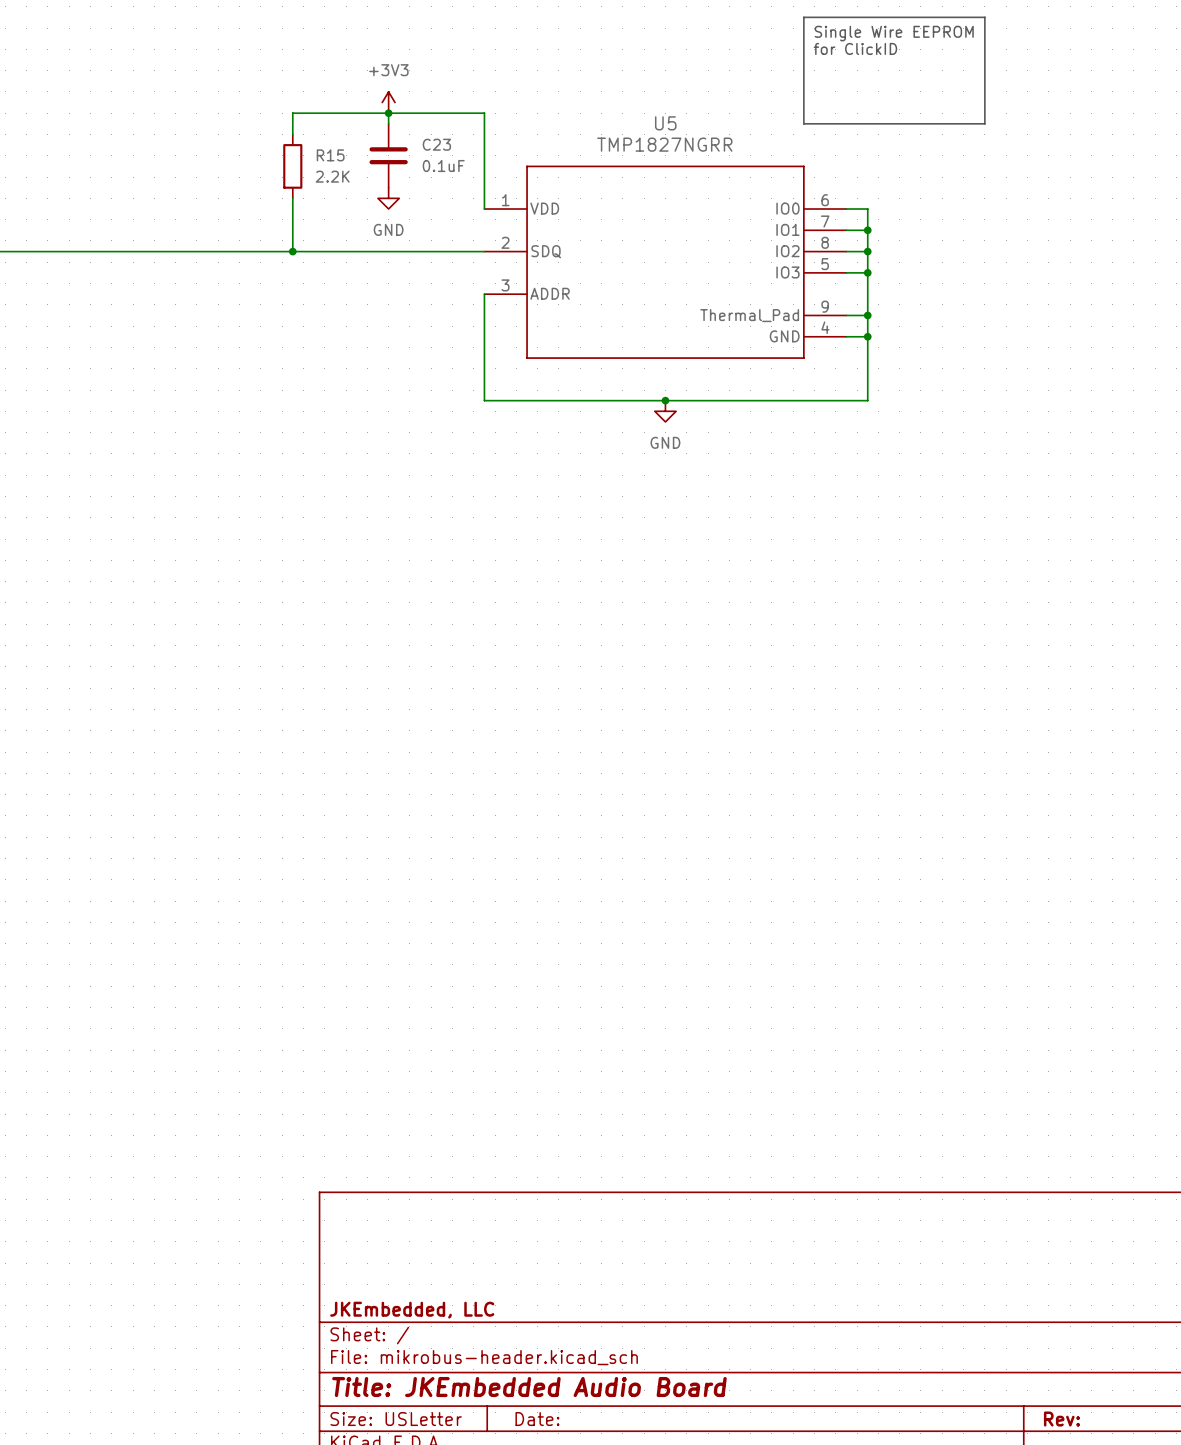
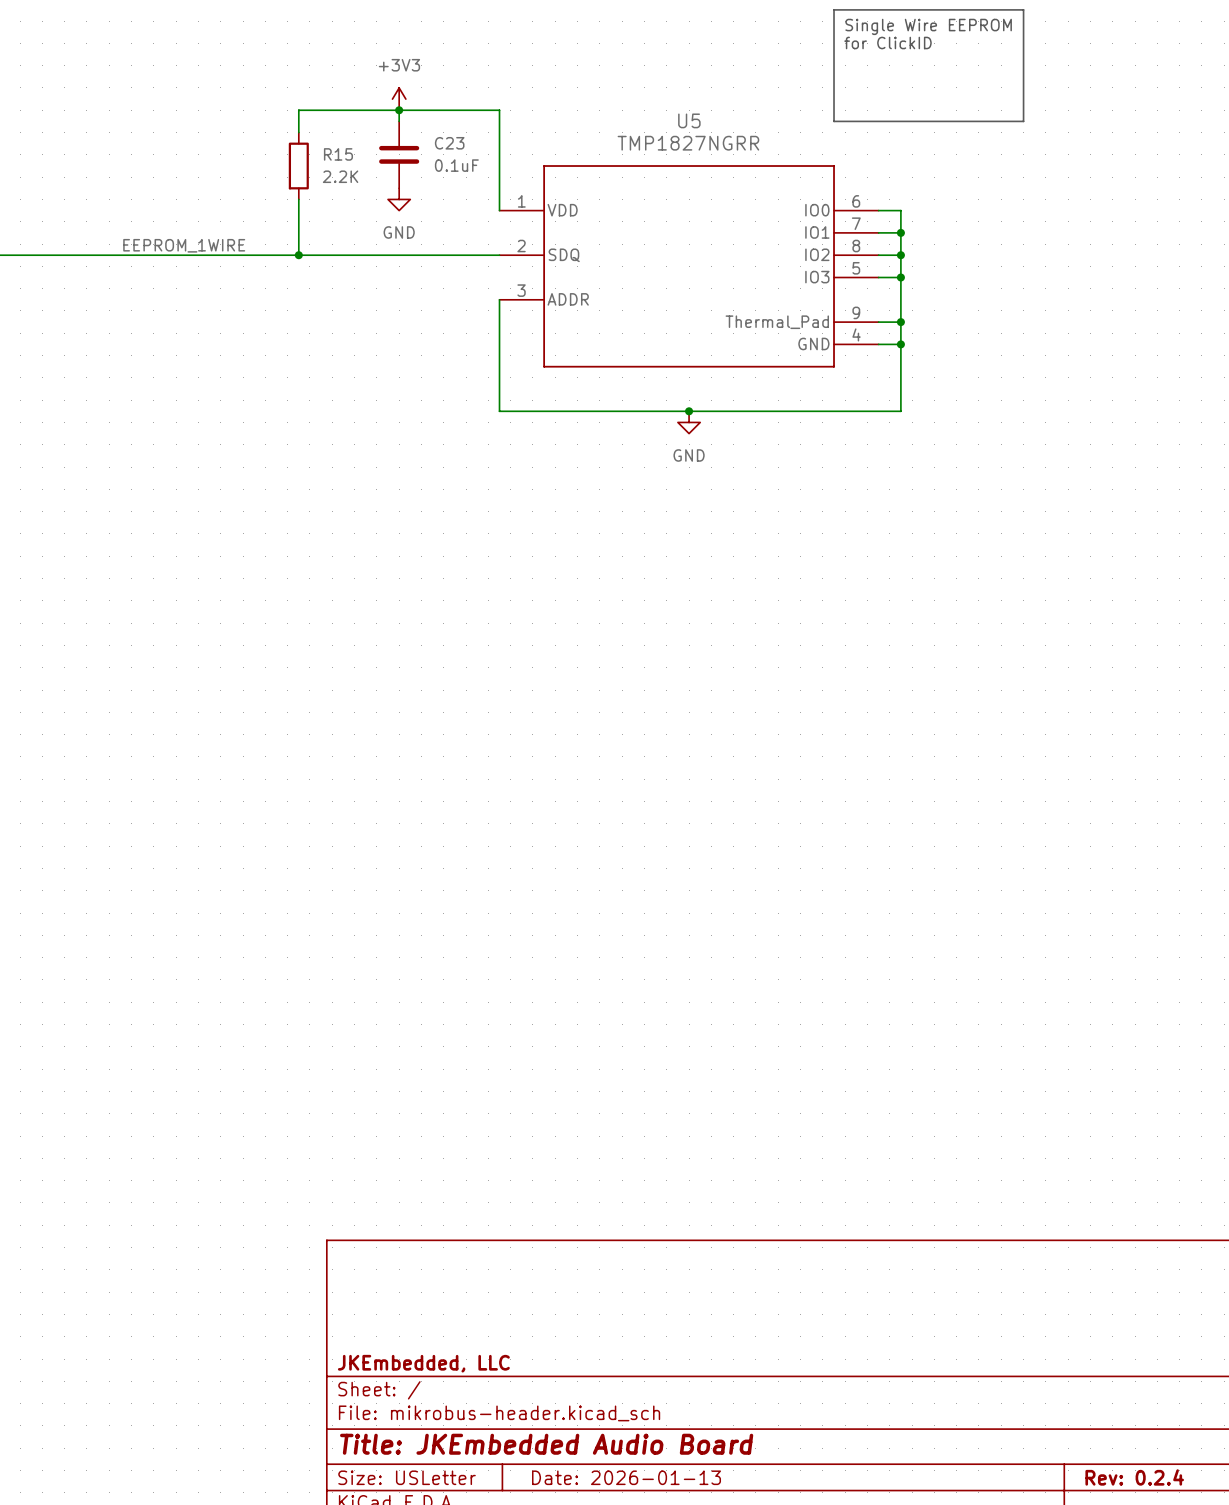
label: none -> EEPROM_1WIRE (184, 245)
title block: Date: (537, 1419) -> Date: 2026-01-13 (626, 1477)
title block: Rev: (1061, 1419) -> Rev: 0.2.4 (1134, 1477)

